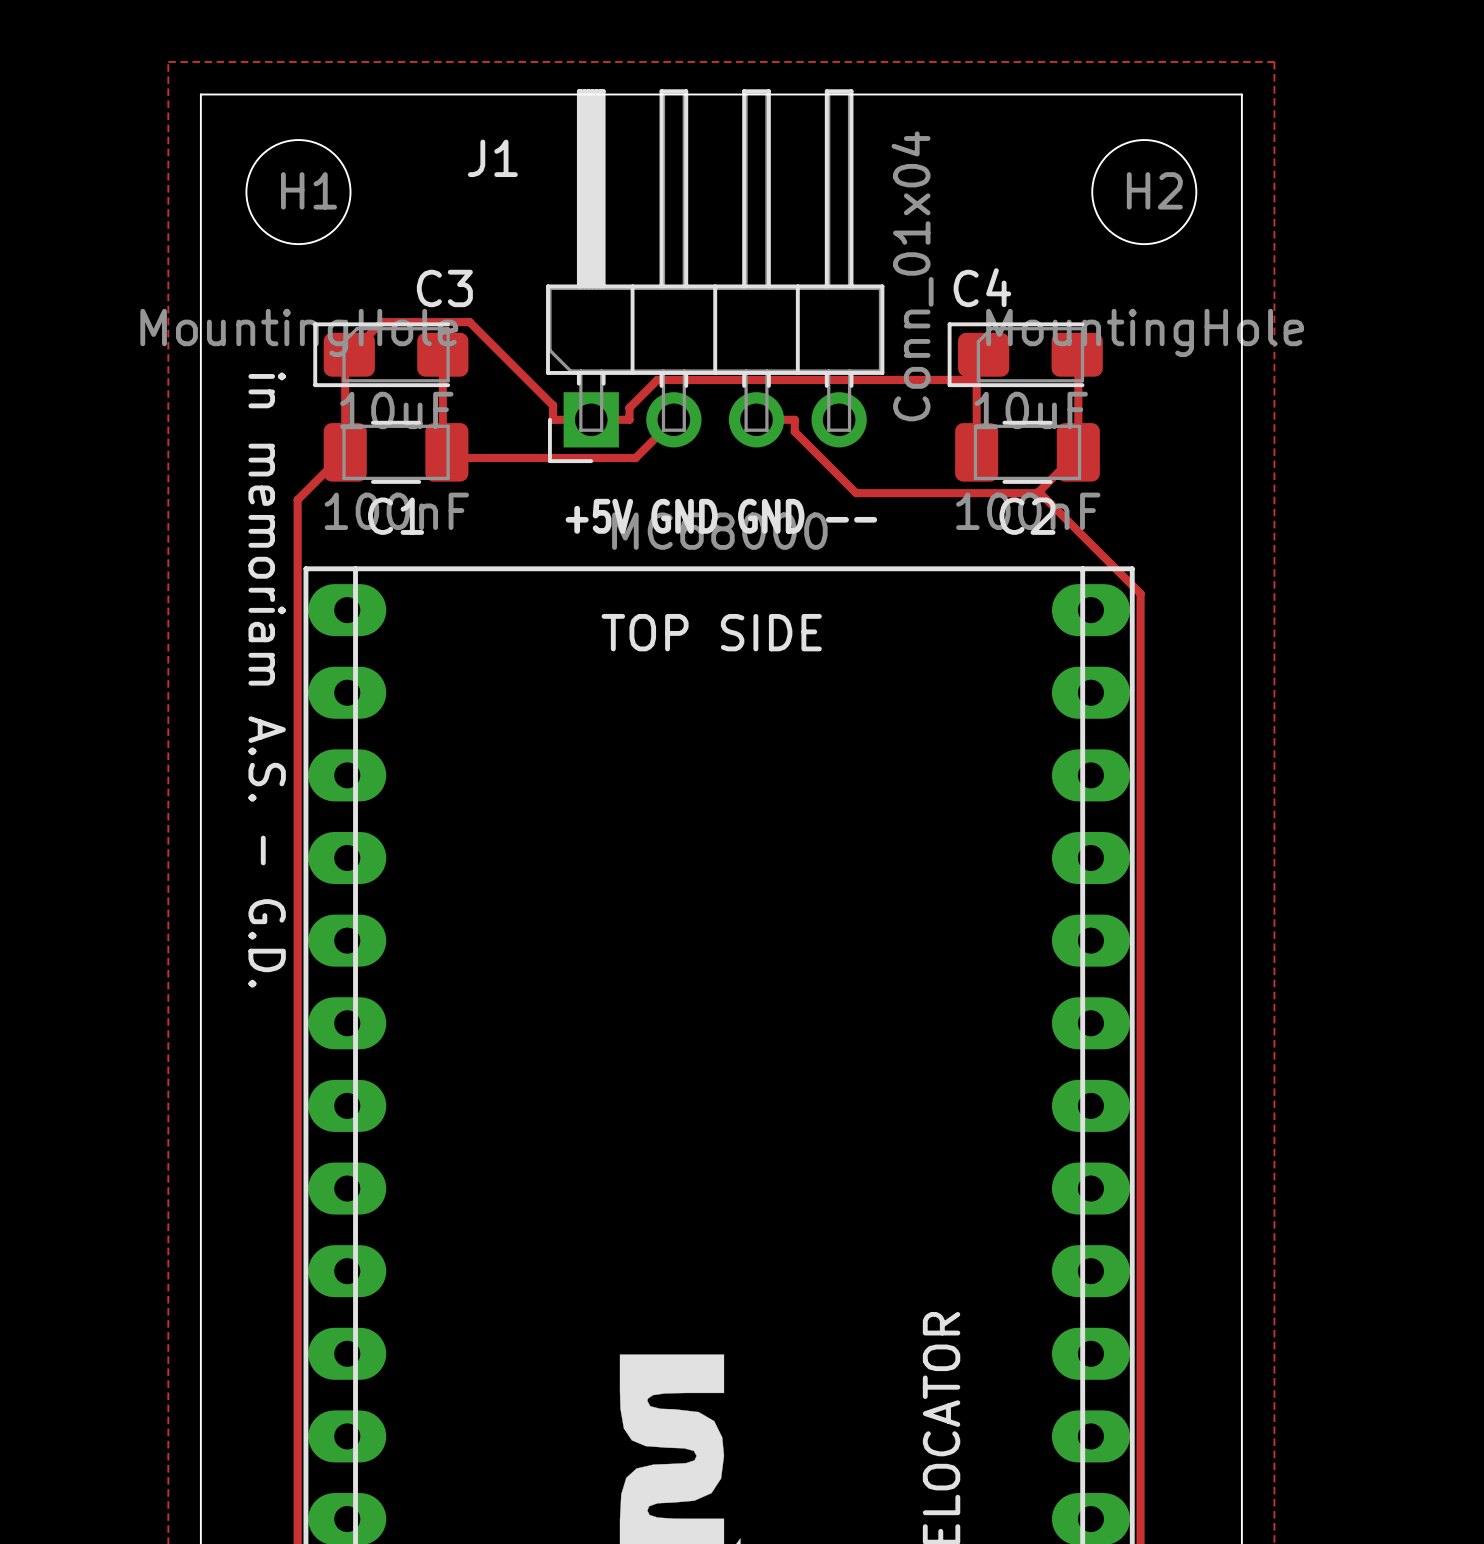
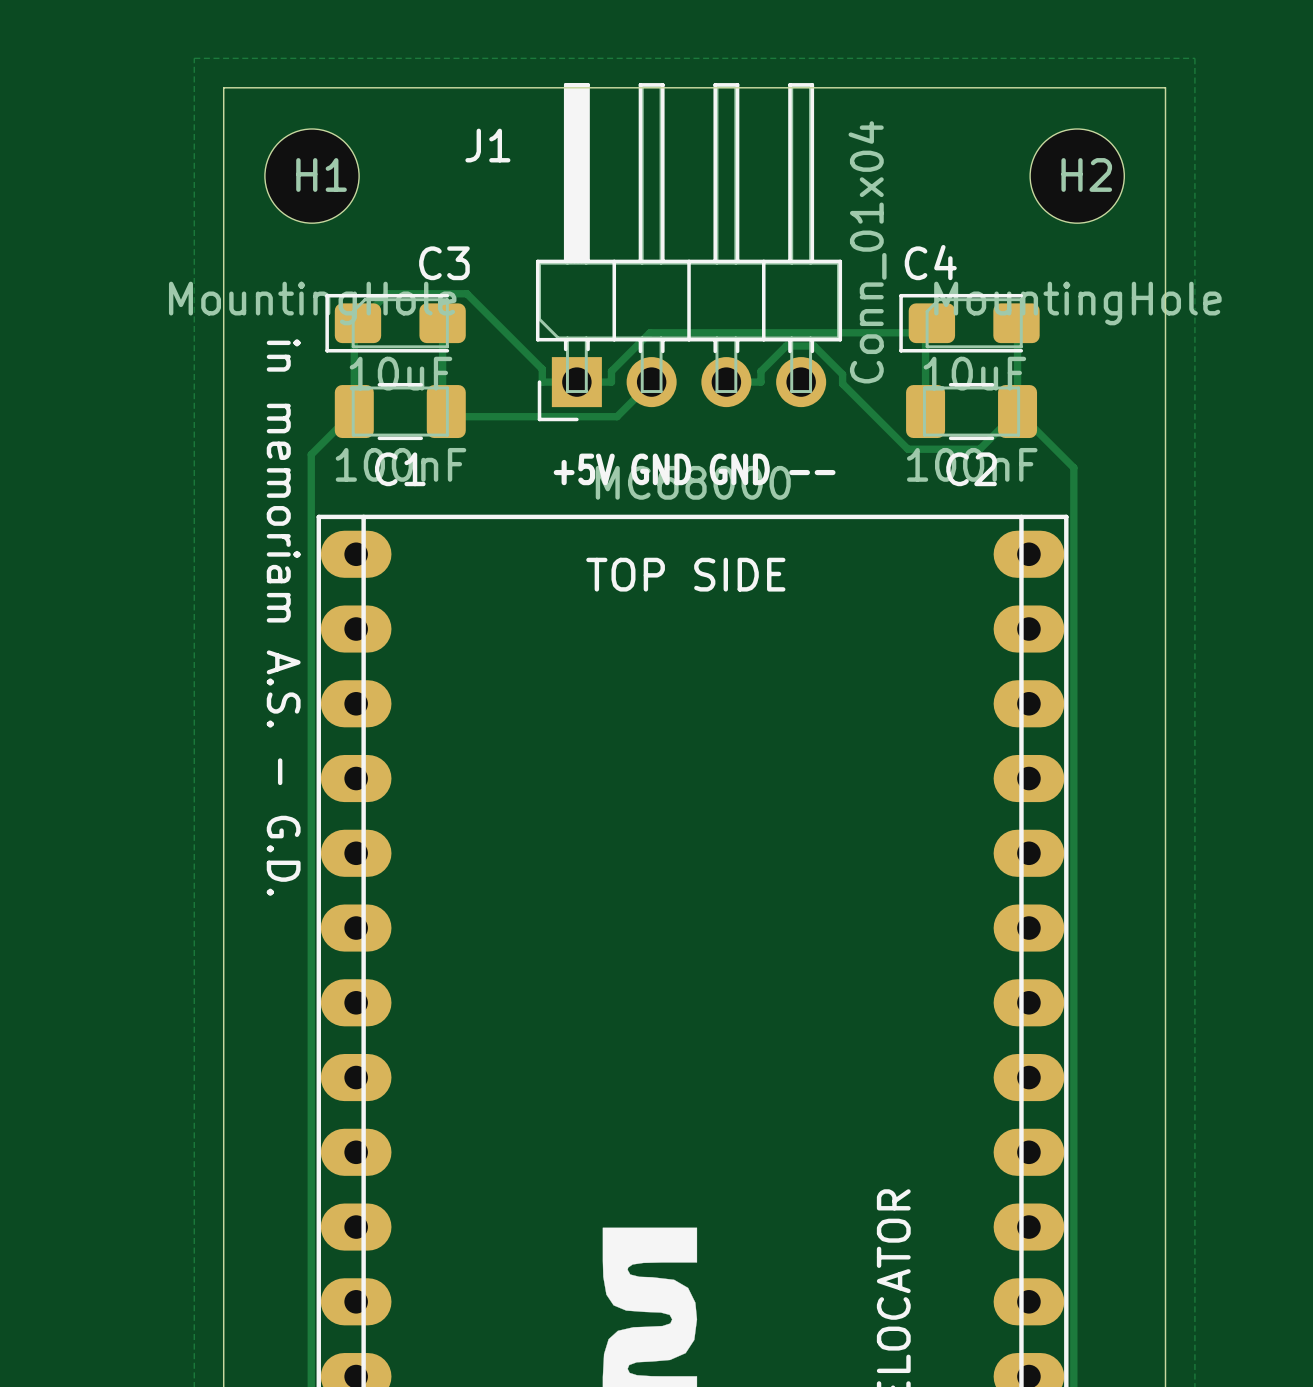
track: none -> (925, 332) (649, 332) (636, 346)
track: (657, 379) (822, 379) -> (760, 382) (760, 371) (786, 346)
track: (853, 379) (976, 379) -> none
track: (794, 419) (794, 431) (856, 493) (1037, 493) -> (814, 346) (842, 374) (842, 383) (907, 449) (980, 448)
track: (1038, 491) (1140, 593) -> (1017, 411) (1073, 467) (1073, 539)

